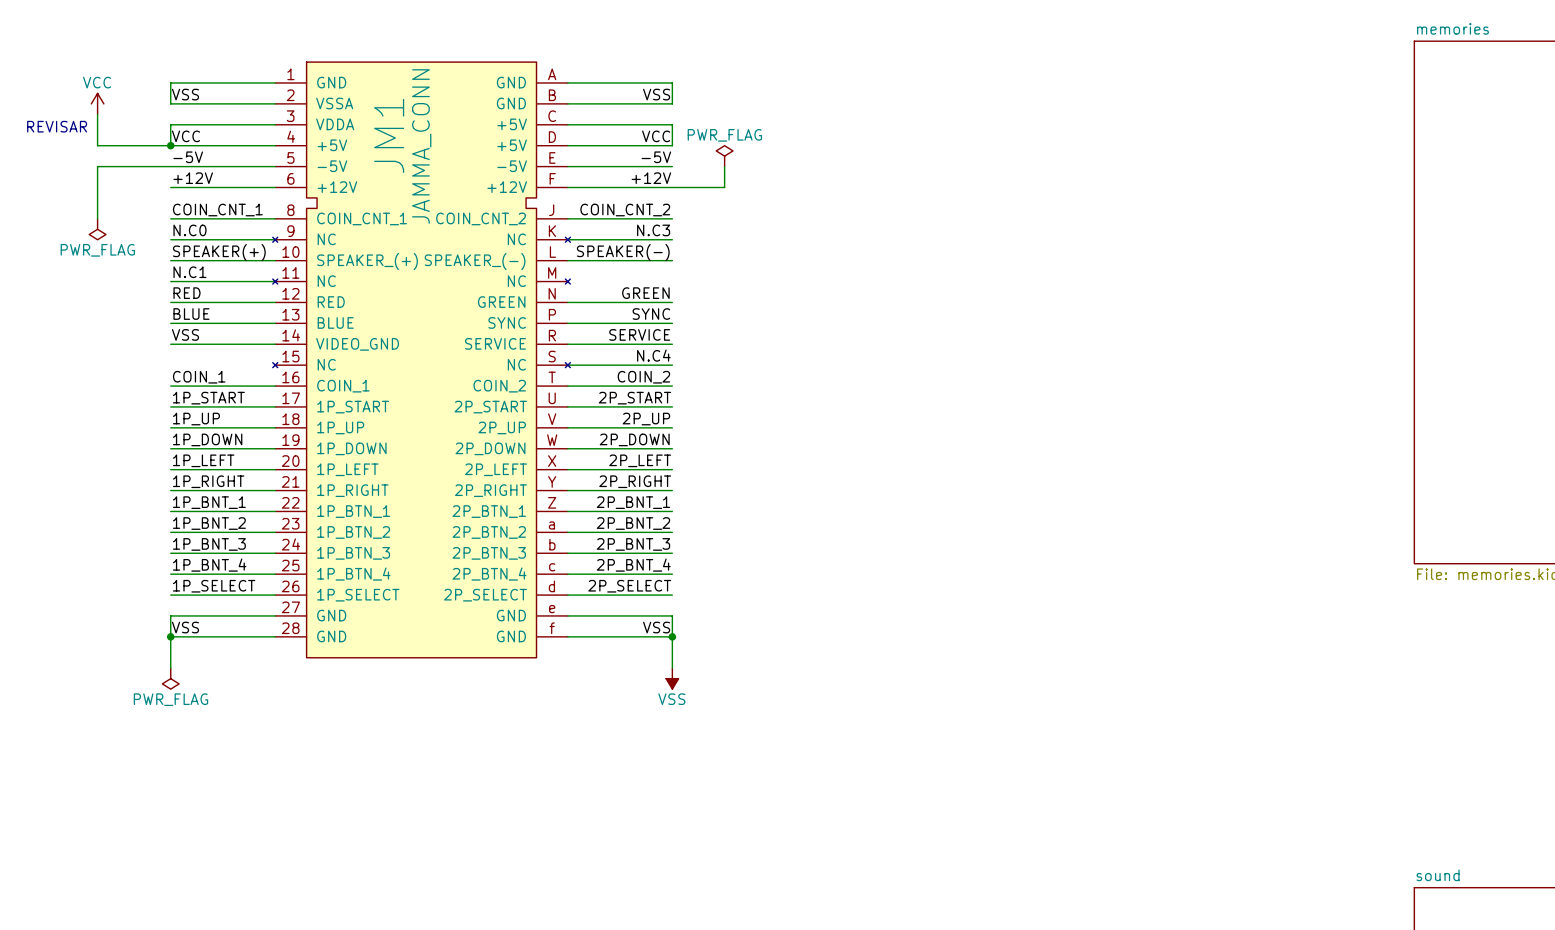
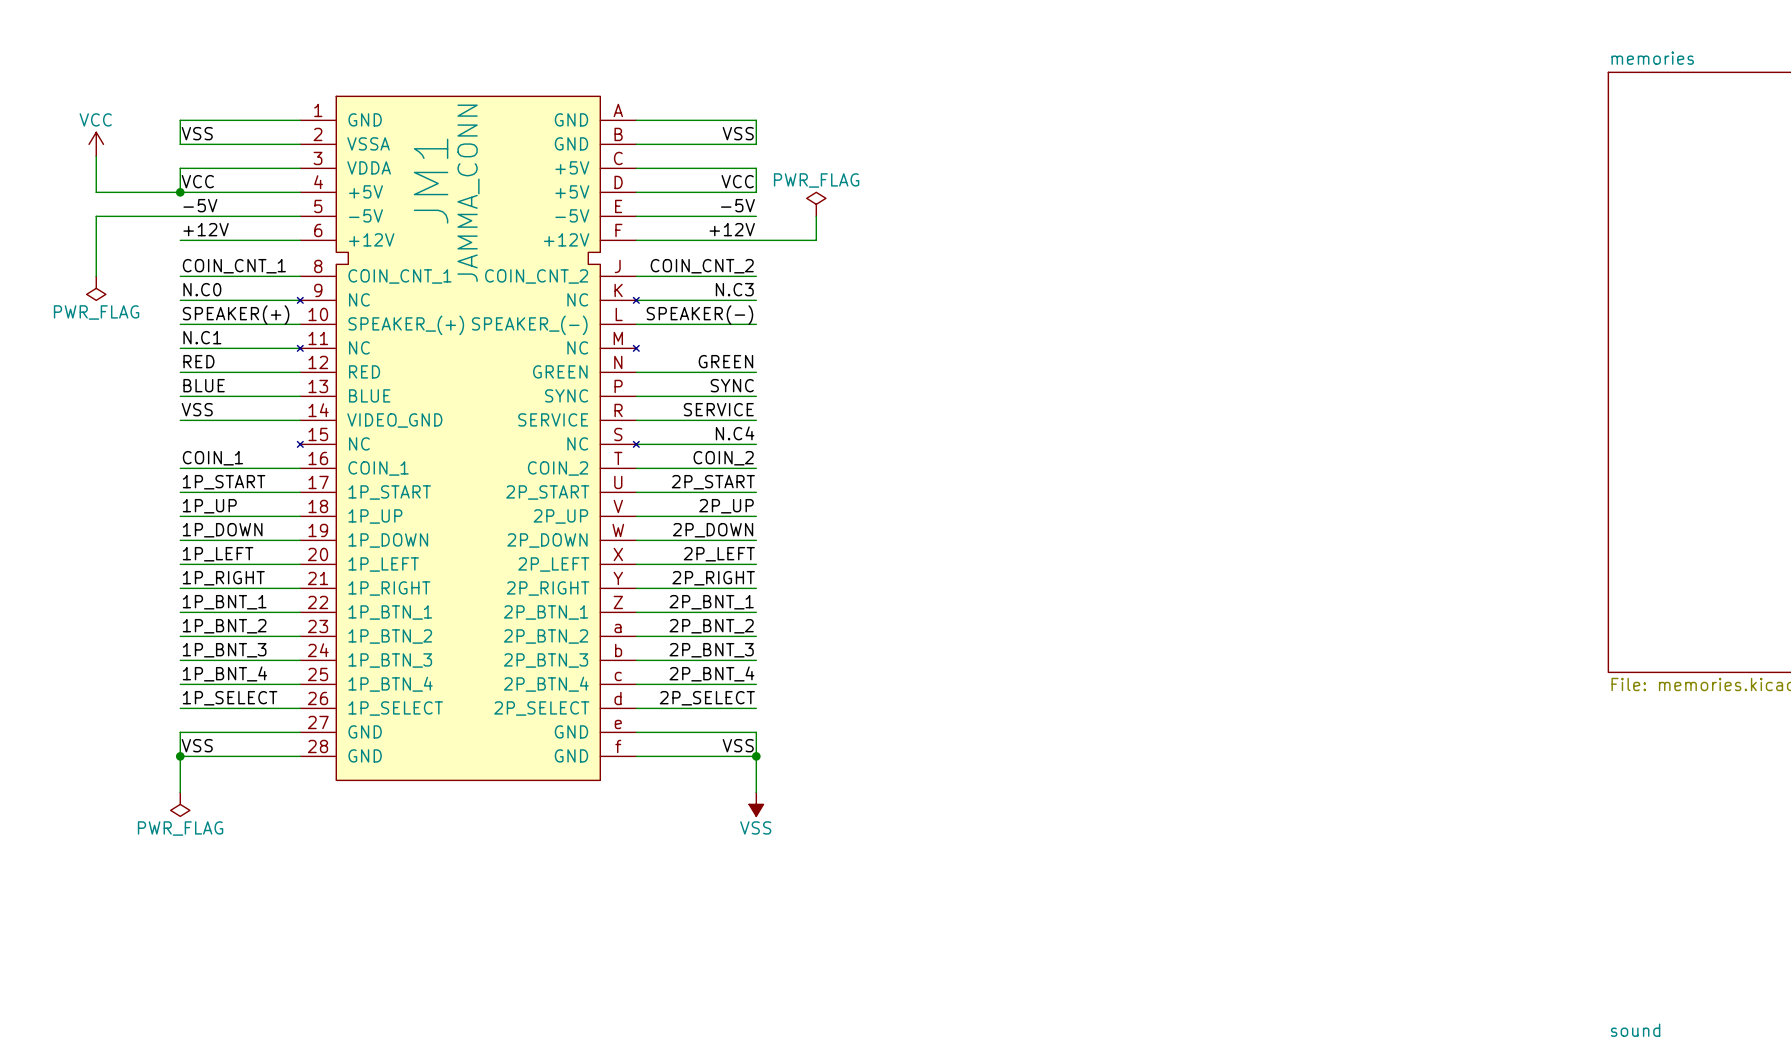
text: REVISAR (57, 126) -> none

